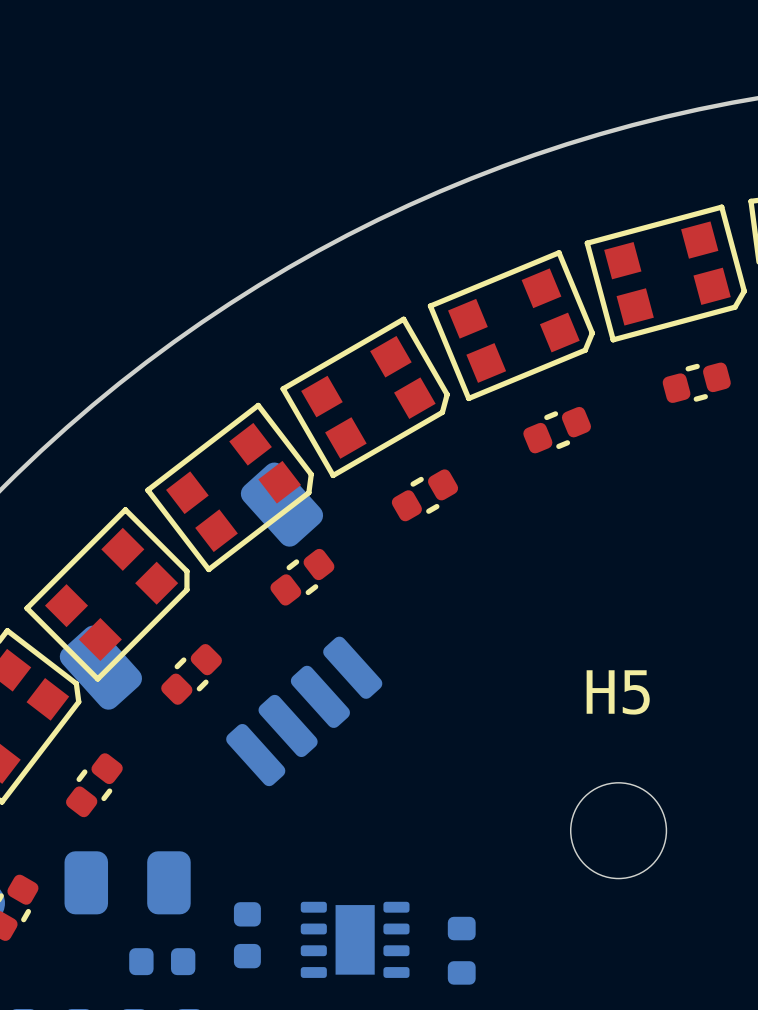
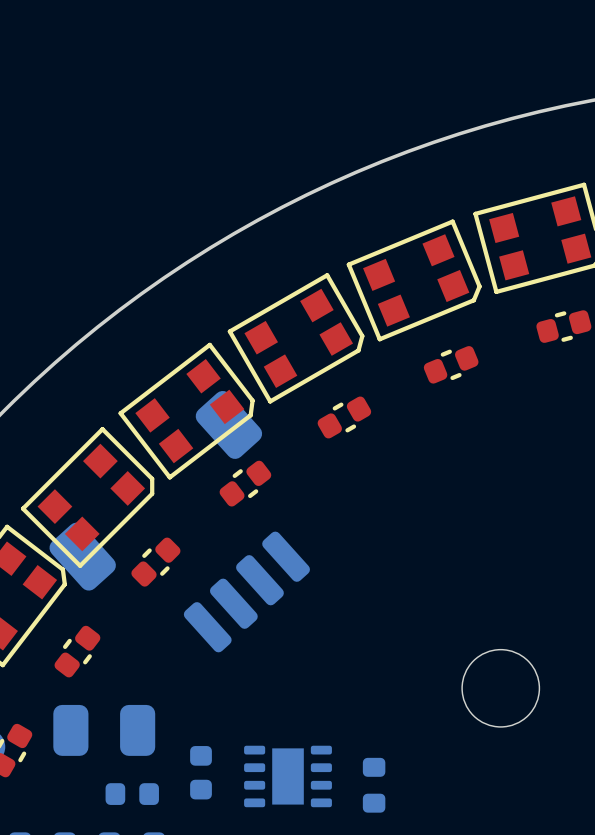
H5 name: H5 (618, 692) -> none

